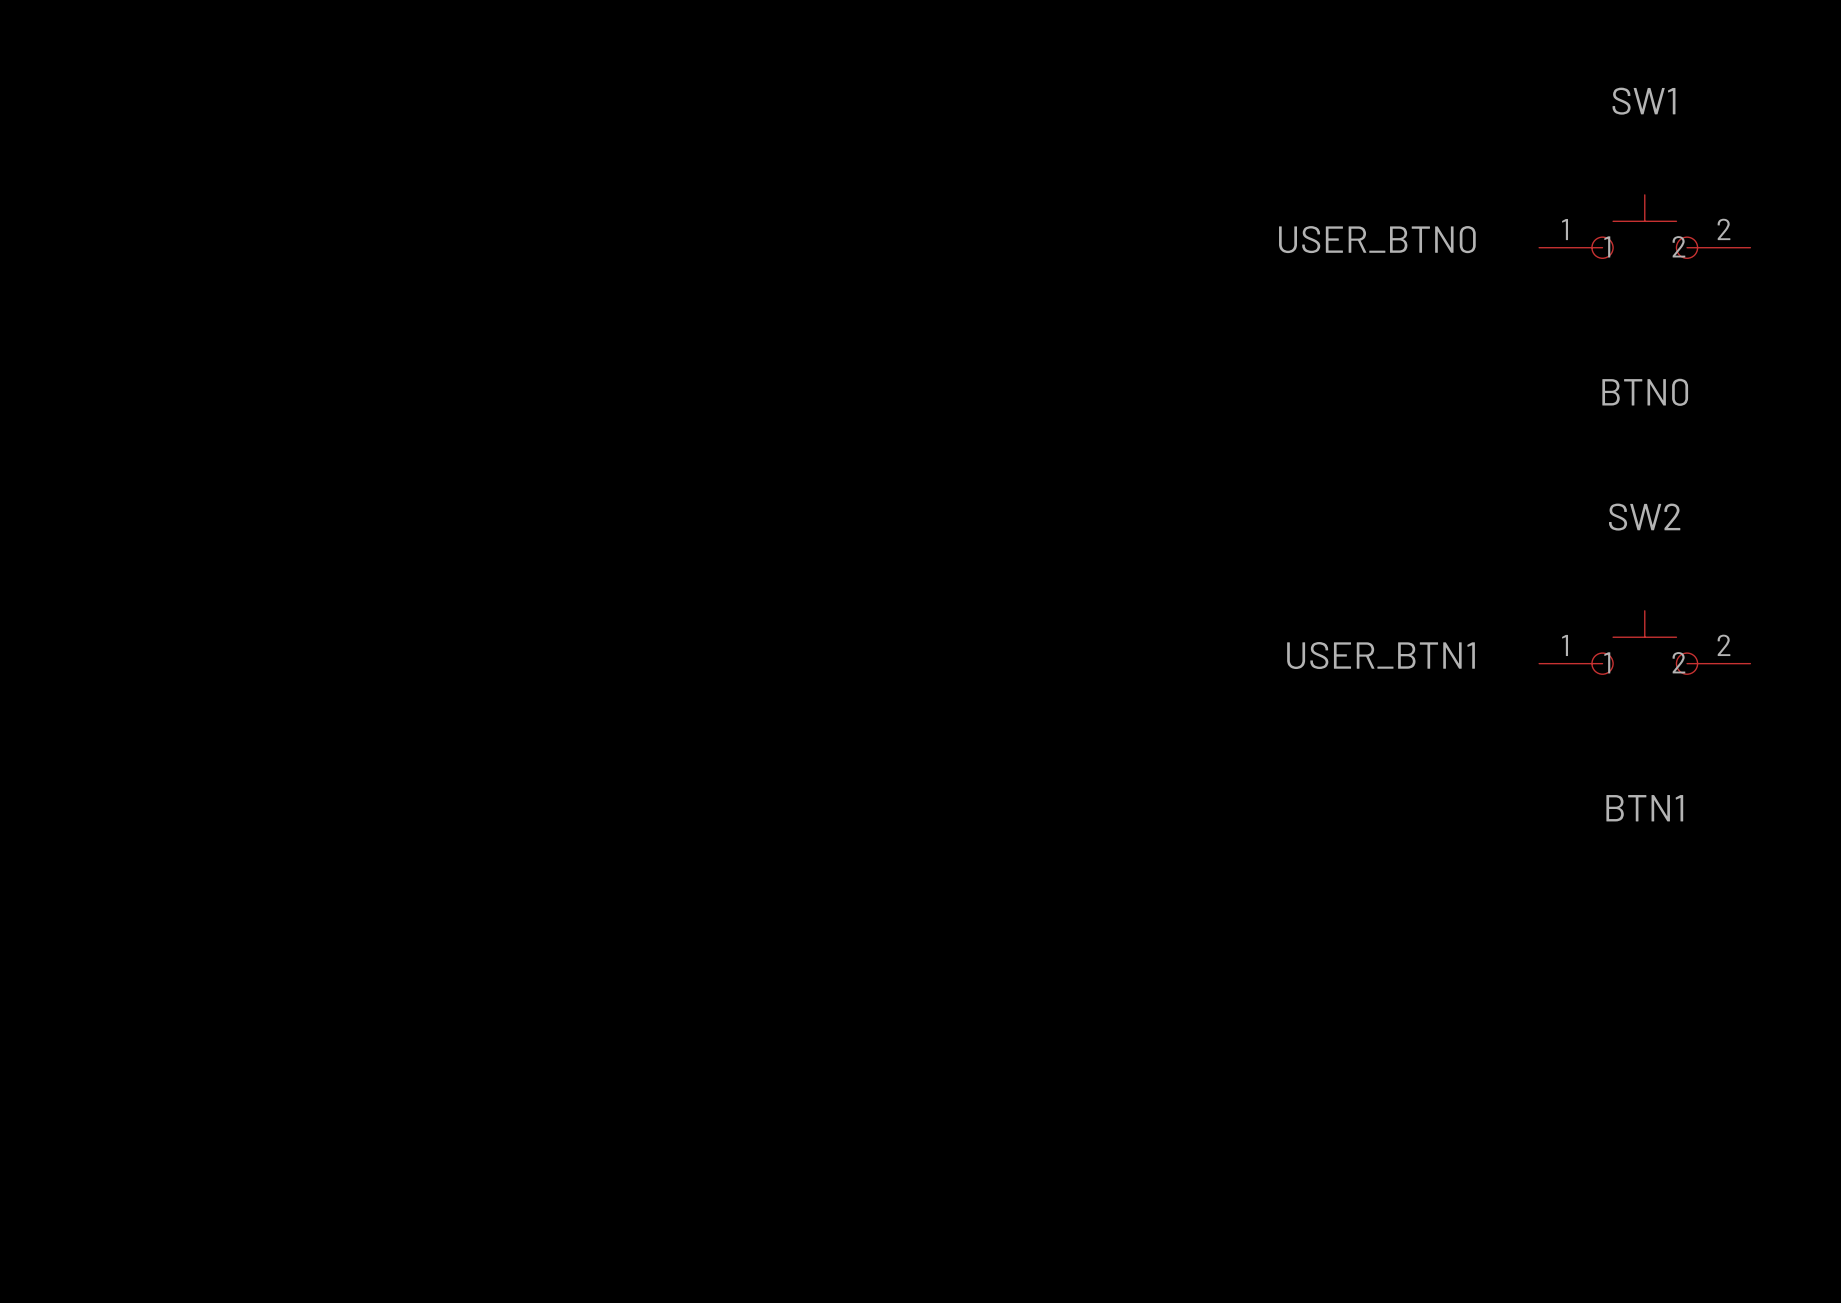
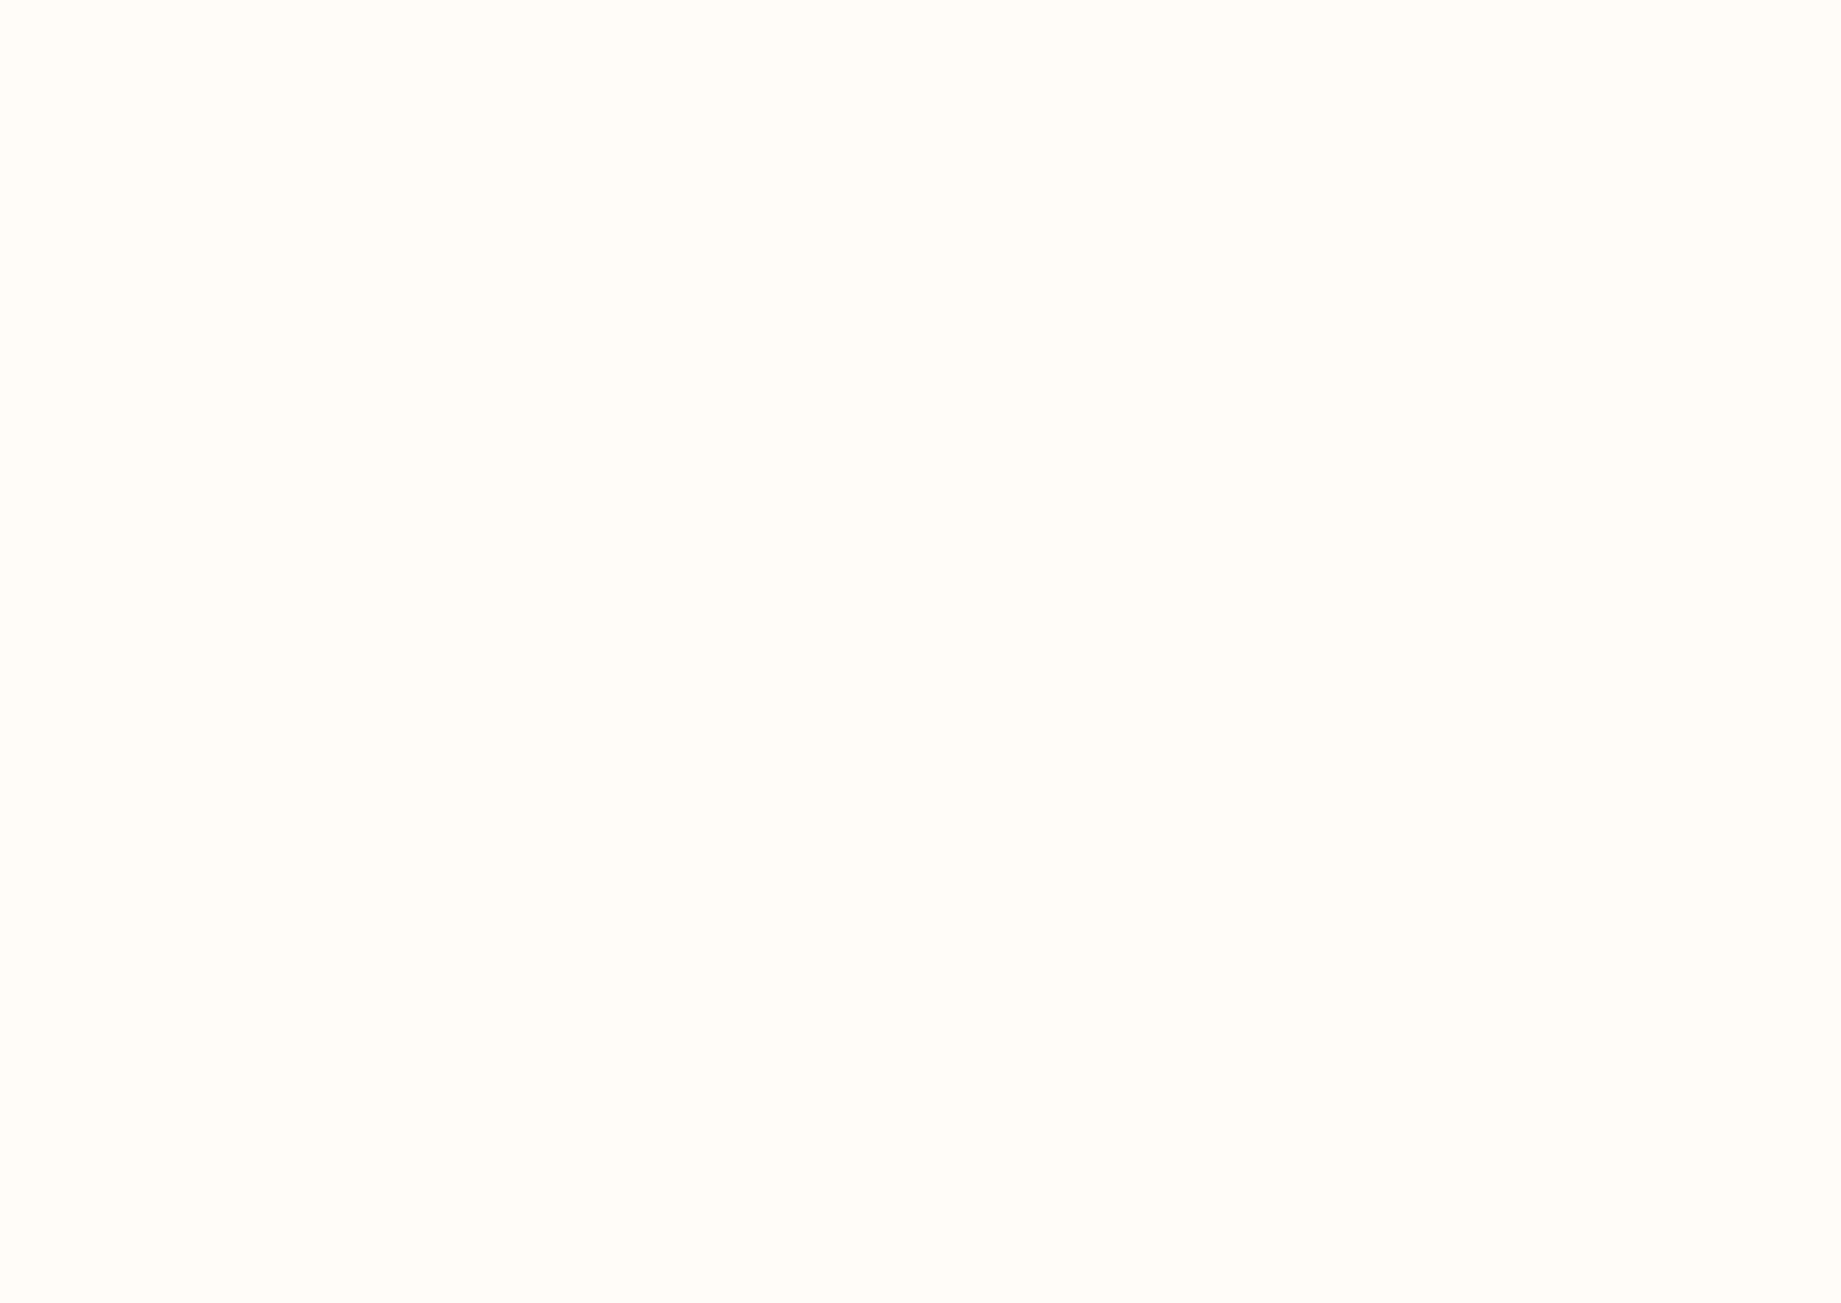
SW1: BTN0 (1644, 226) -> none
label: USER_BTN0 (1377, 239) -> none
SW2: BTN1 (1644, 642) -> none
label: USER_BTN1 (1381, 655) -> none

